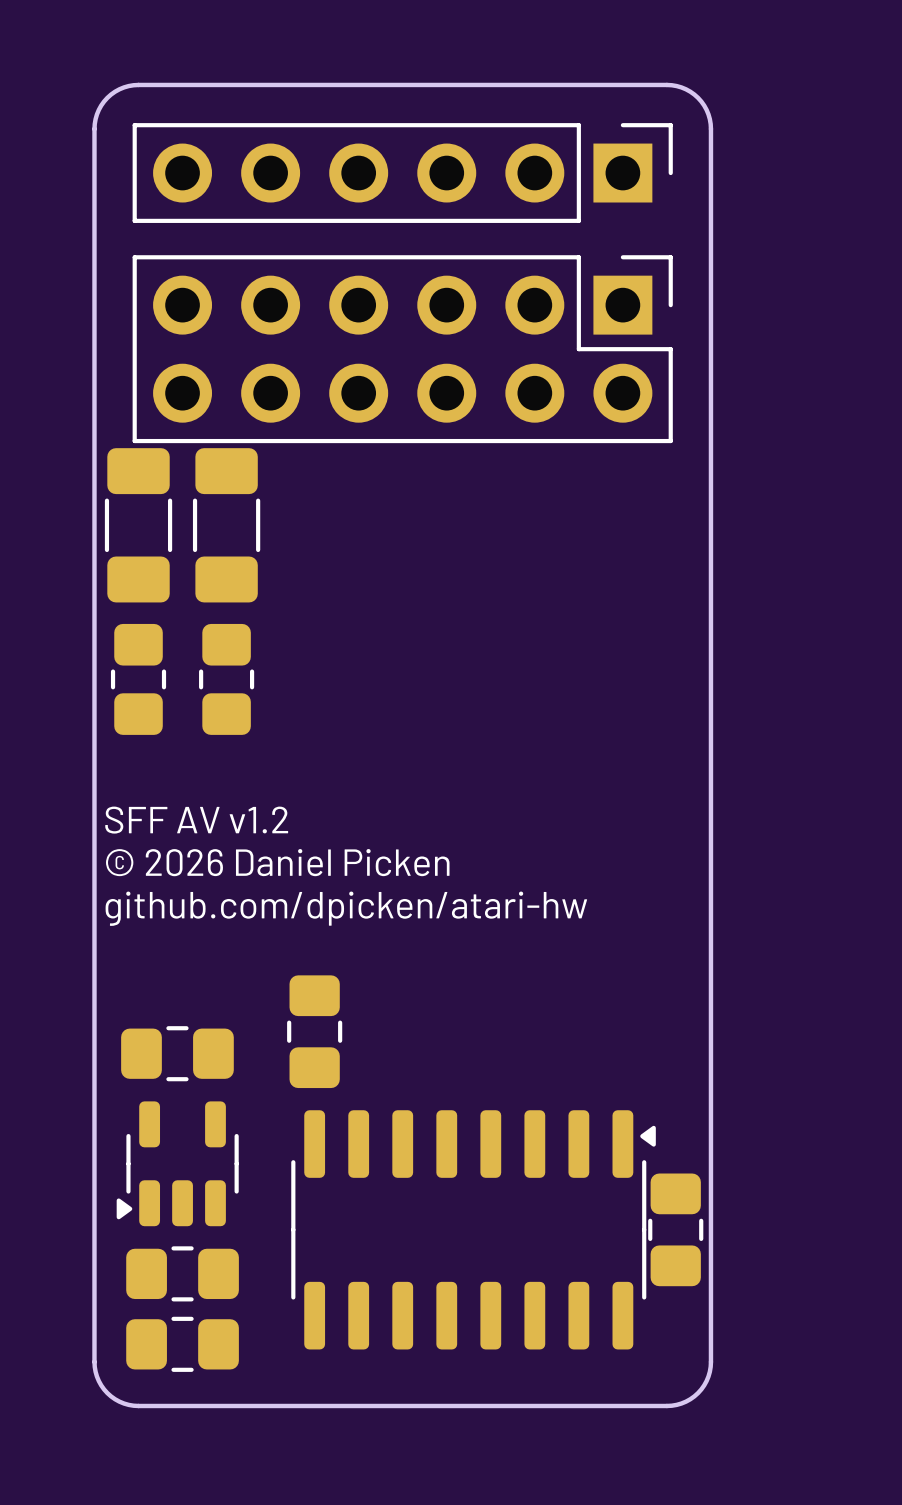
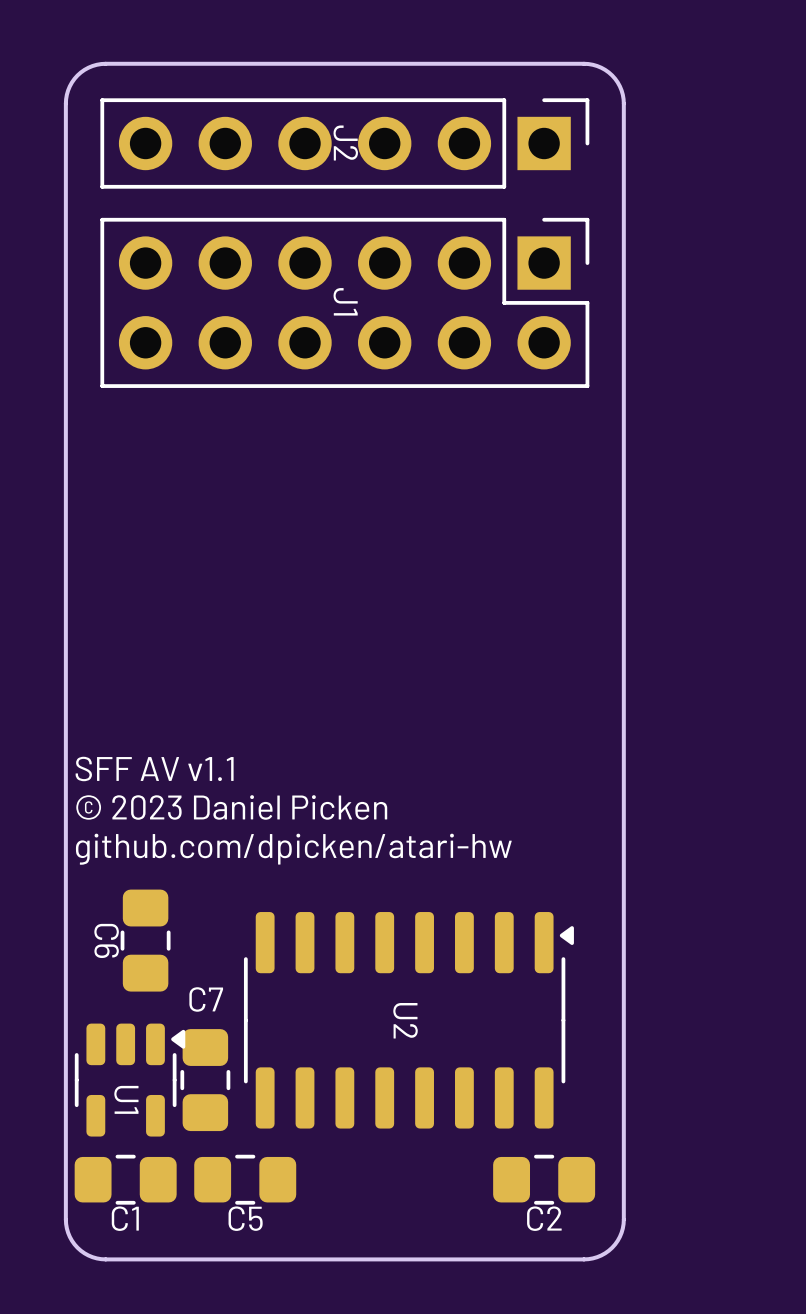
J2 name: none -> J2 (345, 143)
J1 name: none -> J1 (345, 301)
part: (138, 525) -> none
part: (226, 525) -> none
part: (138, 679) -> none
part: (226, 679) -> none
text: SFF AV v1.2 (196, 820) -> none
text: © 2026 Daniel Picken (277, 862) -> SFF AV v1.1 (154, 768)
text: github.com/dpicken/atari-hw (346, 908) -> © 2023 Daniel Picken (231, 807)
text: none -> github.com/dpicken/atari-hw (293, 849)
part: (314, 1031) -> none
part: (177, 1053) -> none
C6: none -> (145, 940)
U2: none -> (408, 1020)
part: (177, 1163) -> none
U1: none -> (130, 1080)
C7: none -> (205, 1080)
part: (473, 1229) -> none
part: (675, 1229) -> none
part: (182, 1273) -> none
C1: none -> (125, 1179)
C5: none -> (245, 1179)
C2: none -> (544, 1179)
part: (182, 1344) -> none

